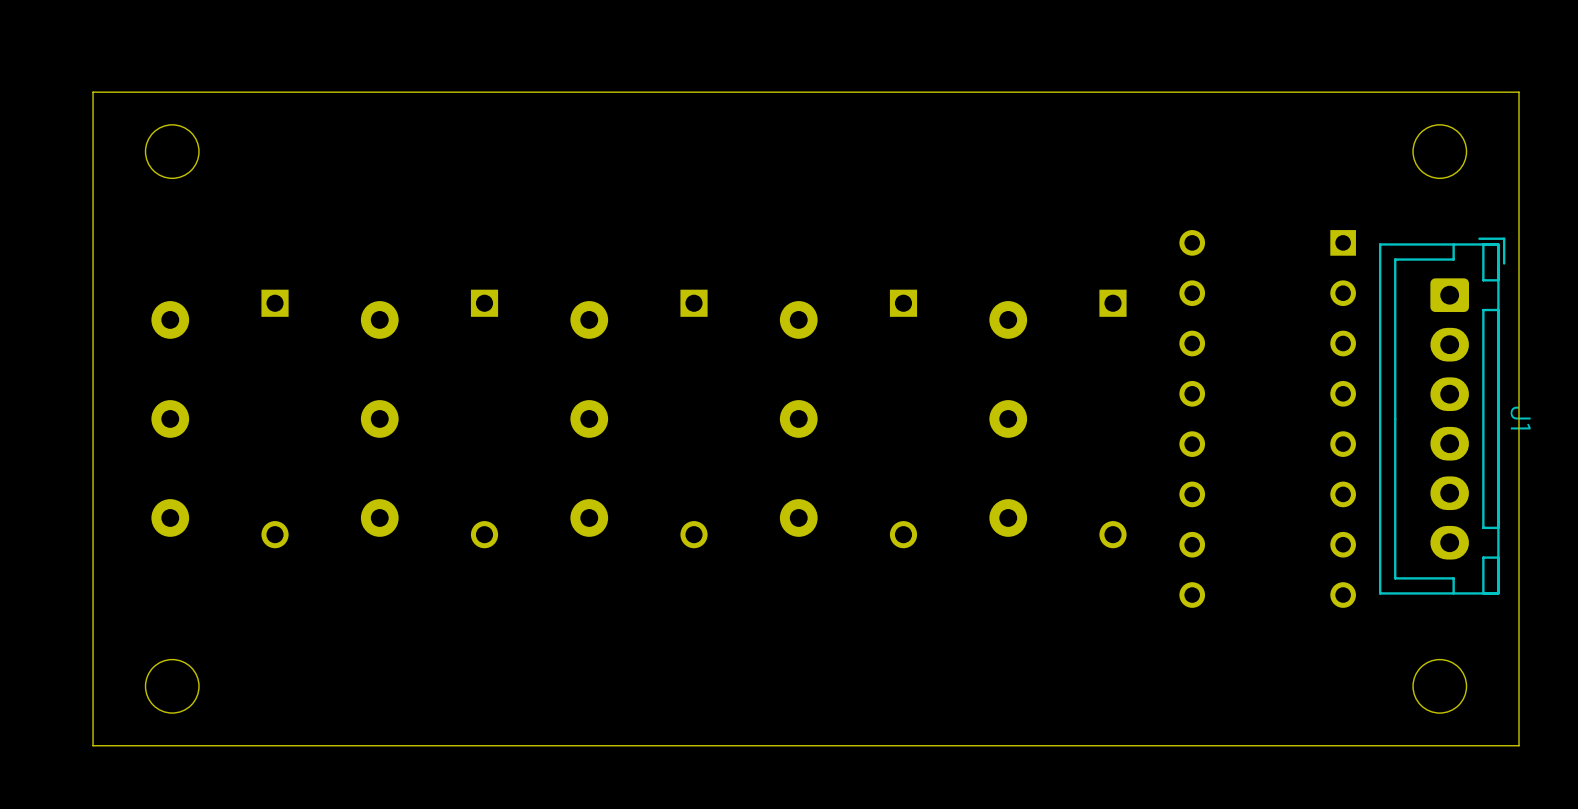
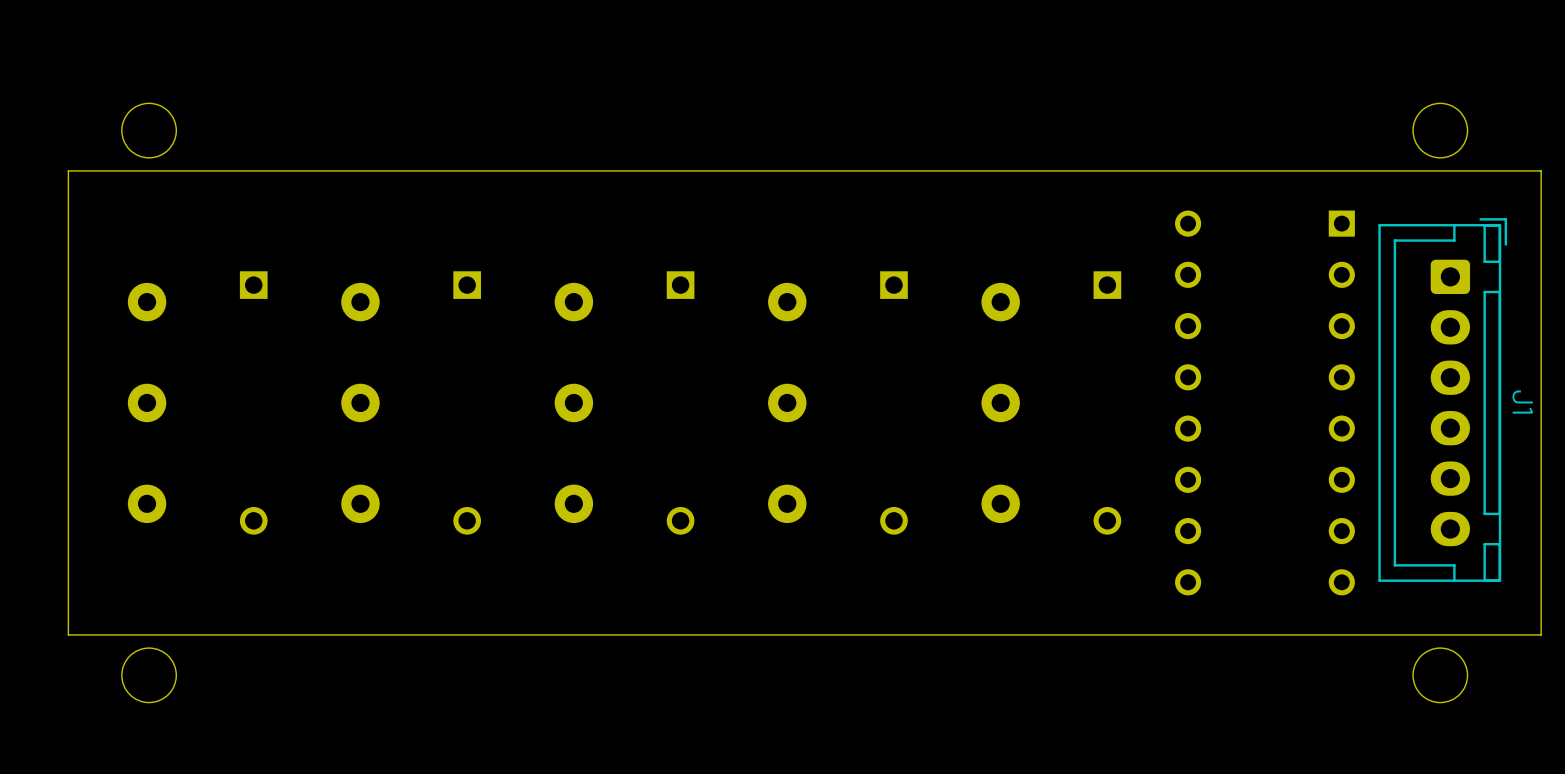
board edge: (93, 191) (93, 92) (1519, 92) (1519, 745) (93, 745) (93, 646) -> (68, 170) (1541, 170) (1541, 634) (68, 634)

